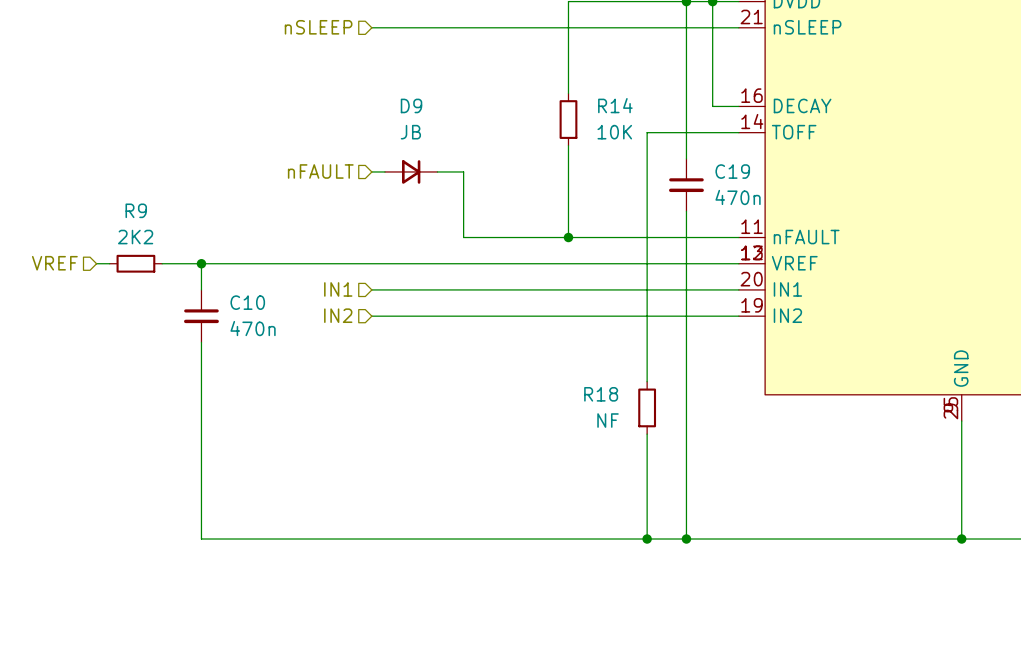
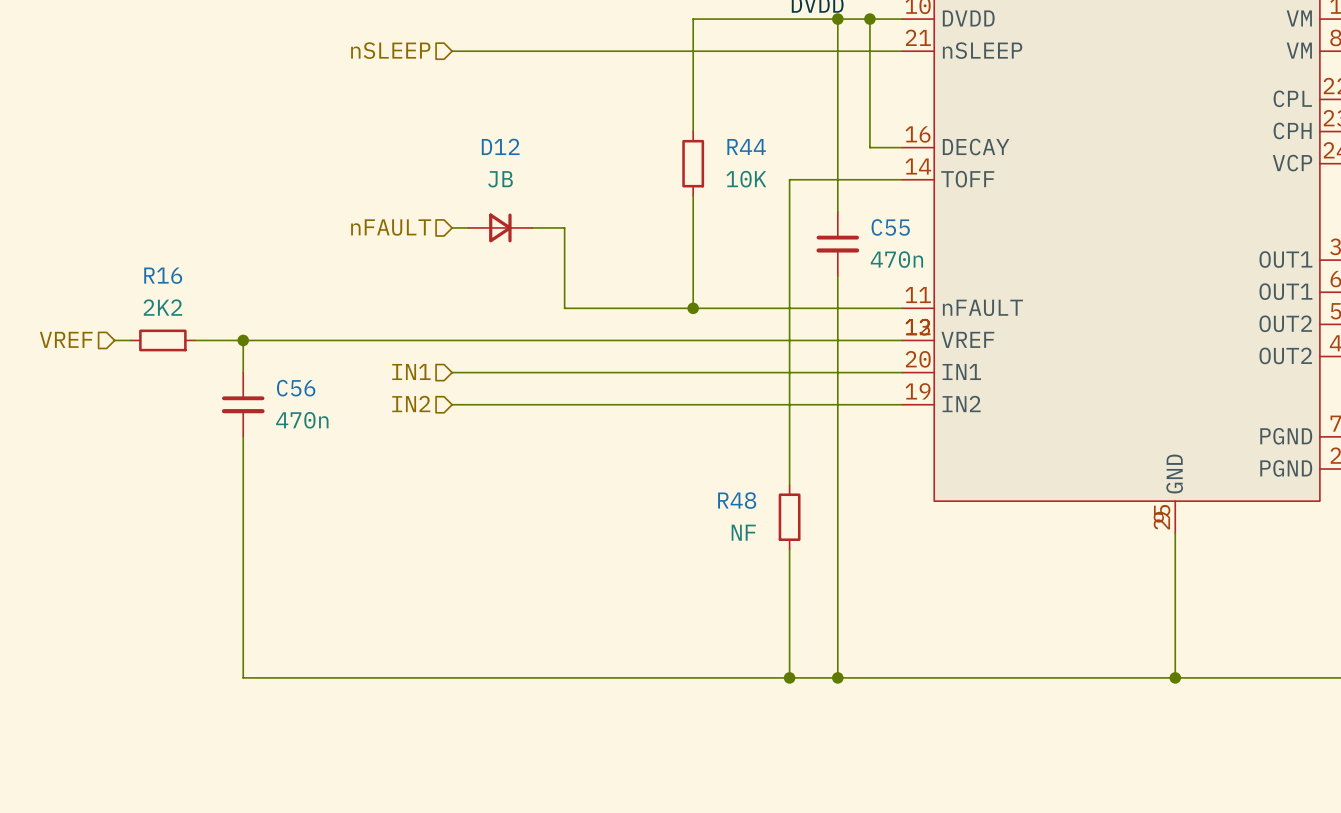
D9 name: D9 (411, 105) -> D12 (500, 146)
R14 name: R14 (615, 105) -> R44 (746, 147)
C19 name: C19 (732, 171) -> C55 (890, 227)
R9 name: R9 (136, 210) -> R16 (163, 275)
C10 name: C10 (247, 302) -> C56 (296, 388)
R18 name: R18 (601, 394) -> R48 (737, 500)

